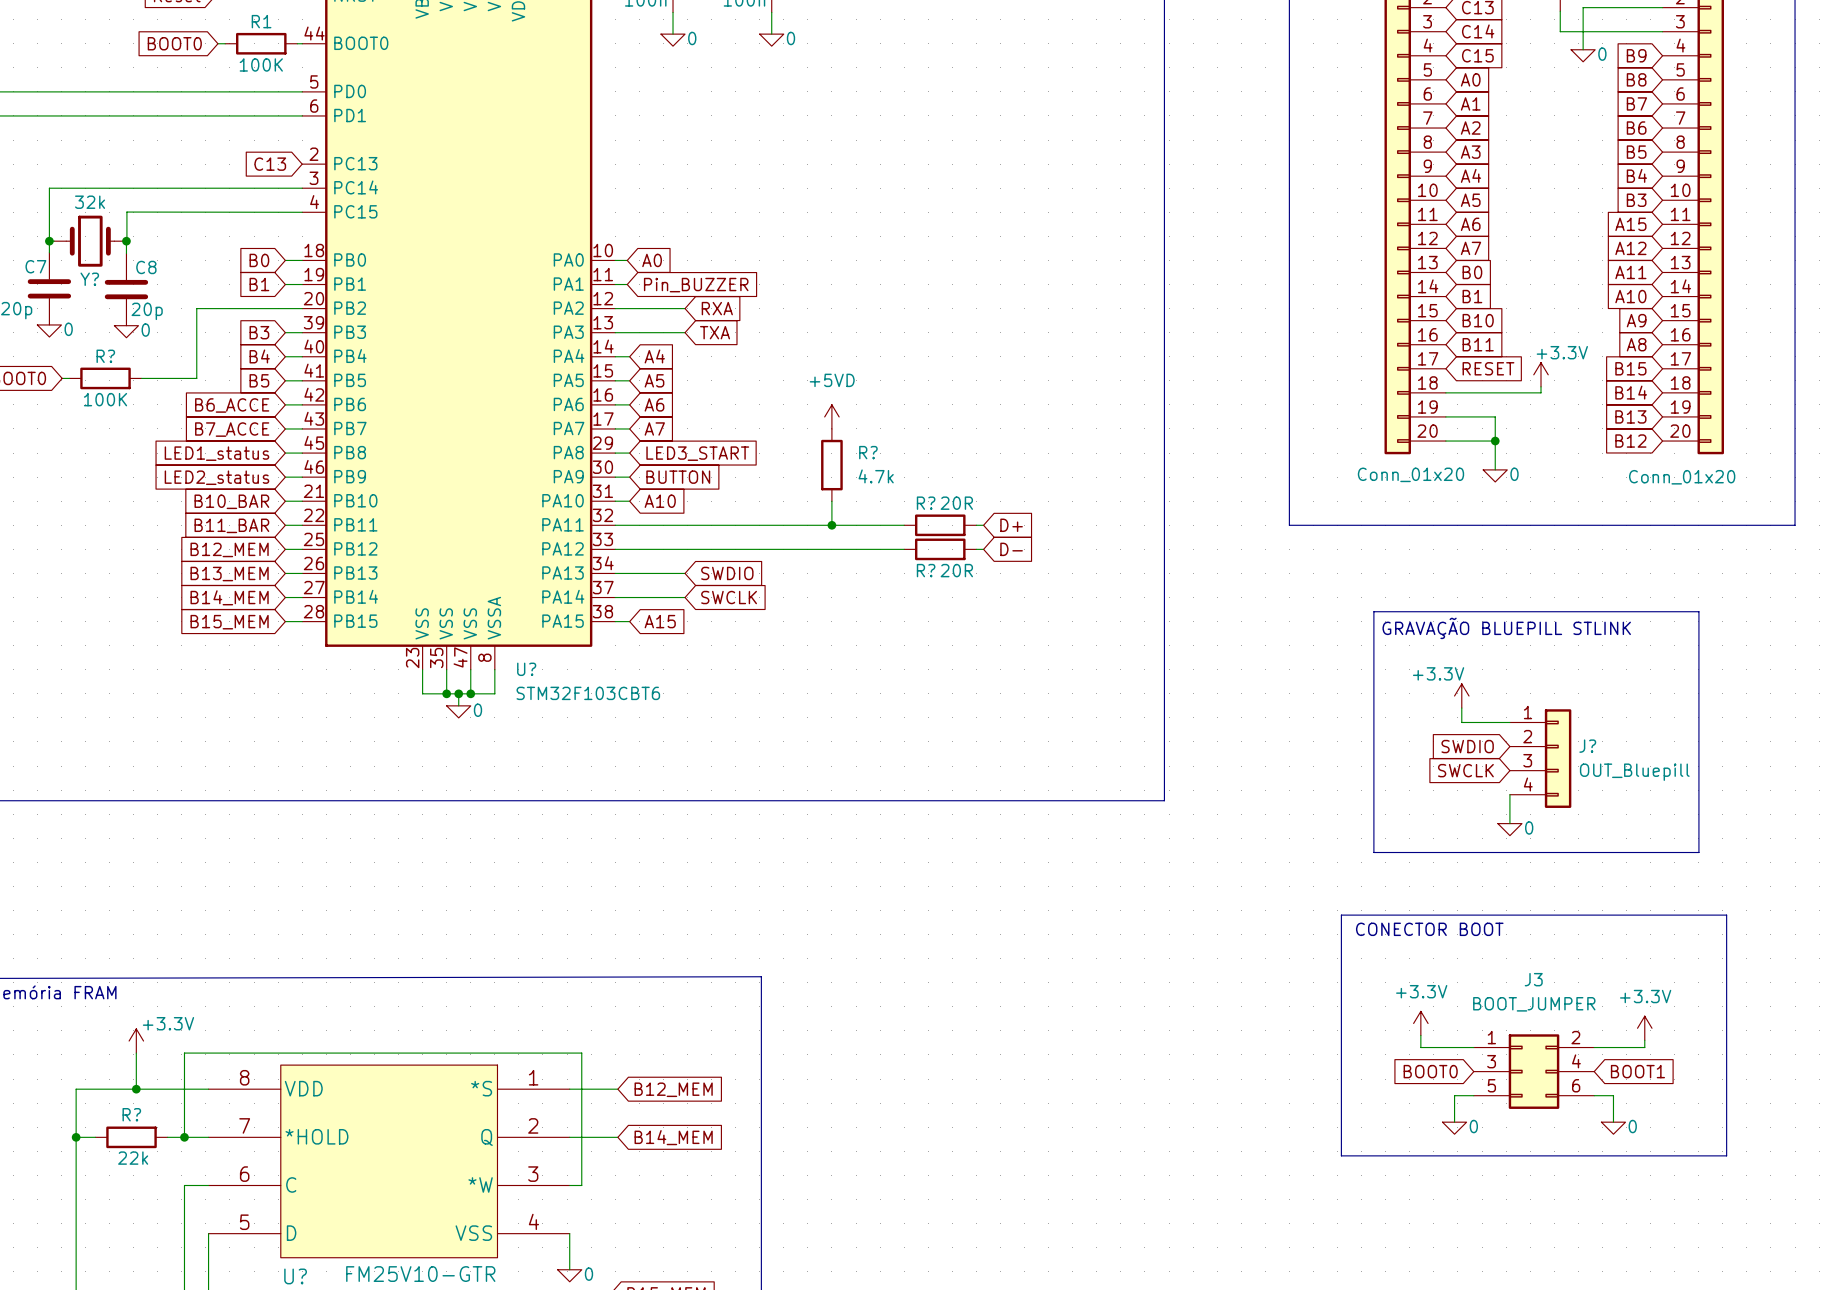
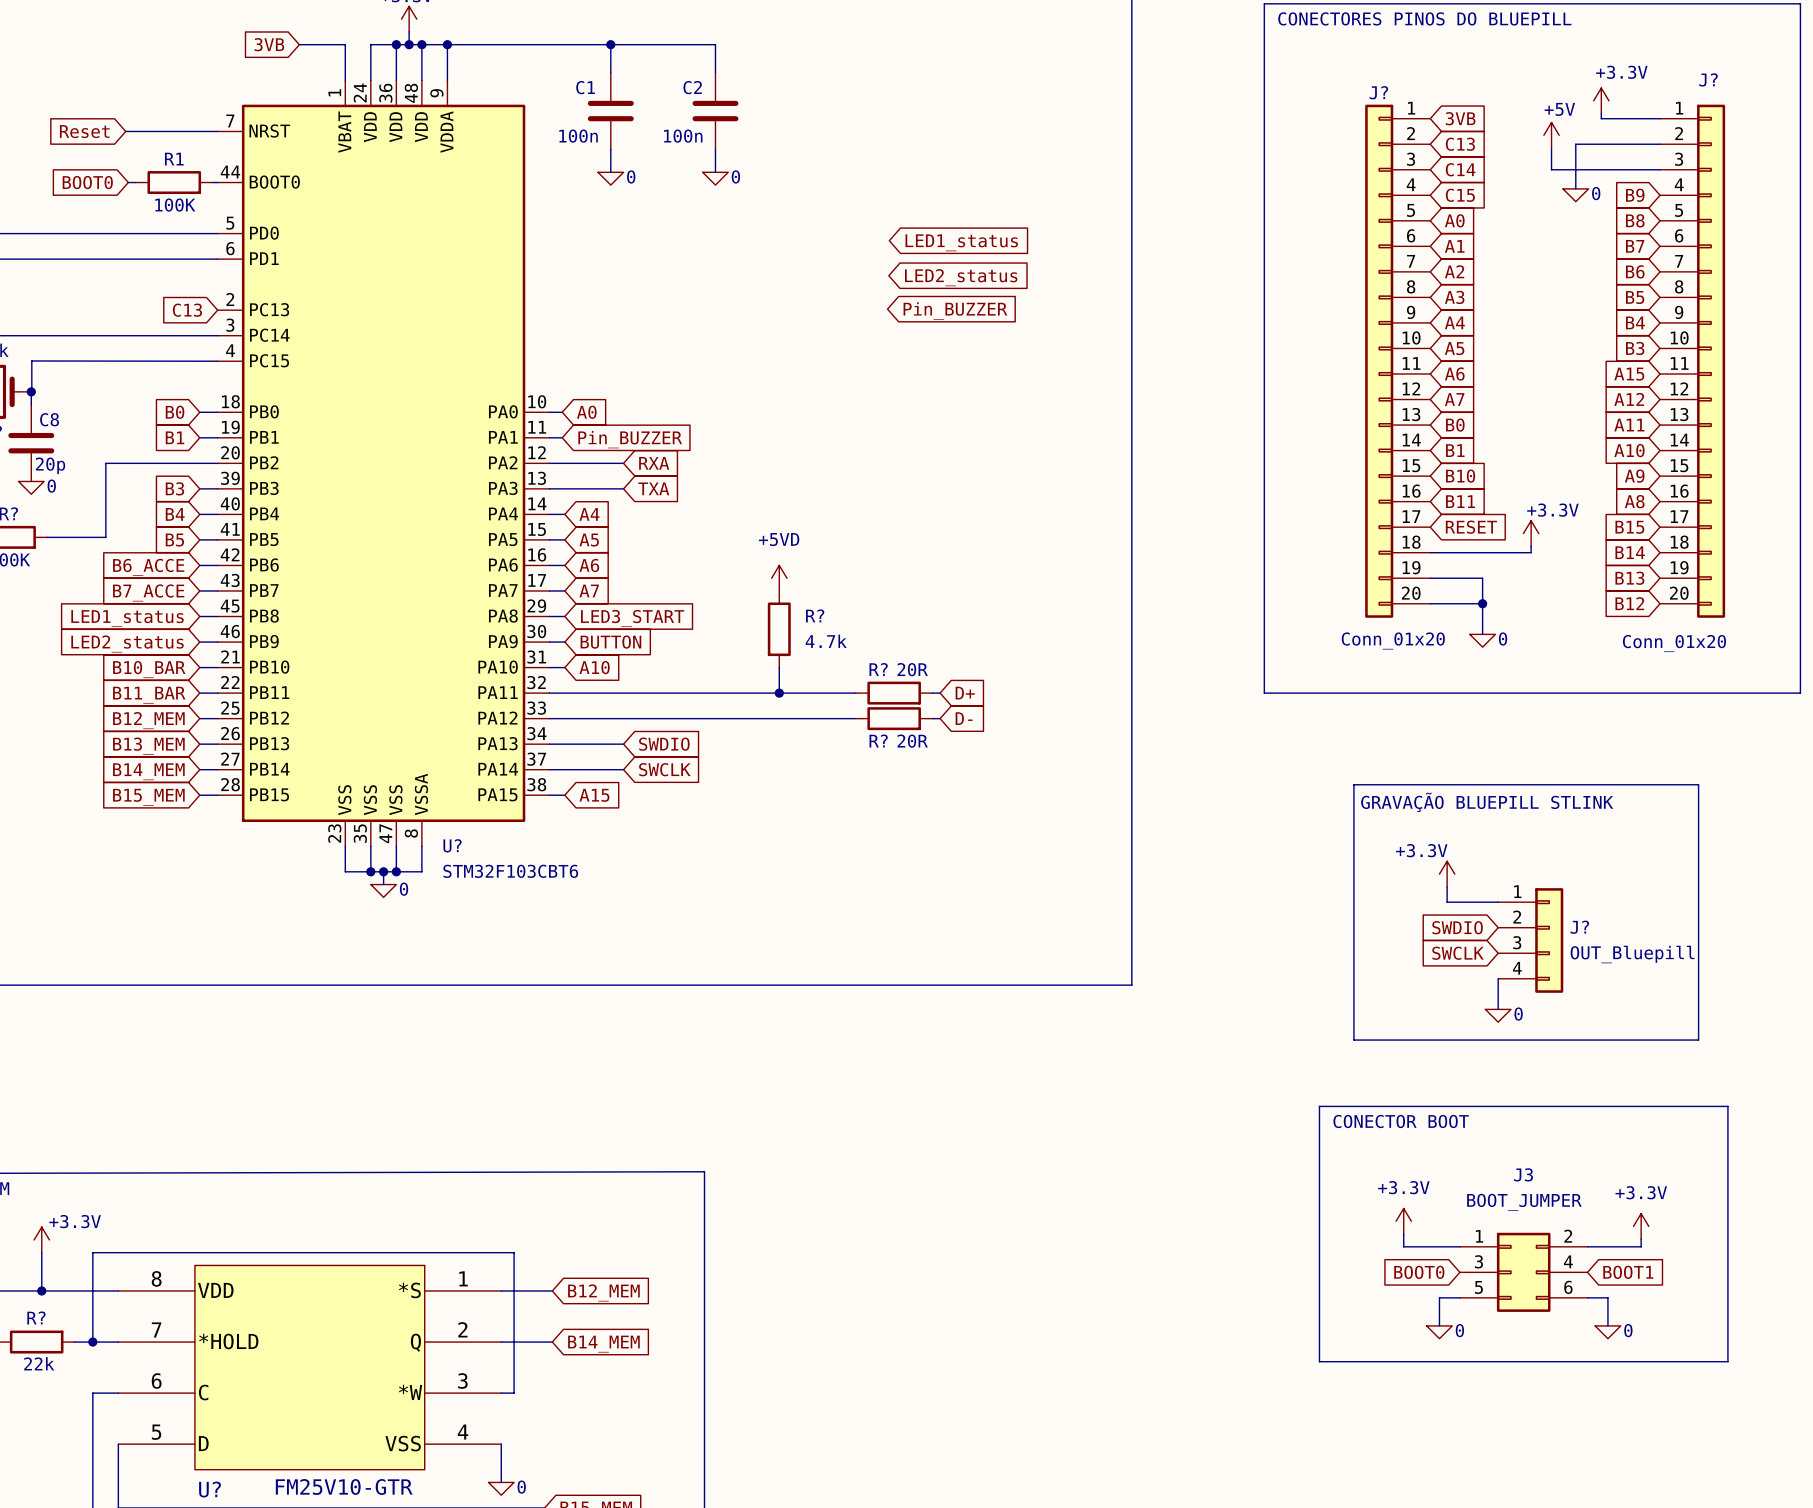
global label: none -> LED1_status (961, 242)
global label: none -> LED2_status (961, 277)
global label: none -> Pin_BUZZER (955, 310)

